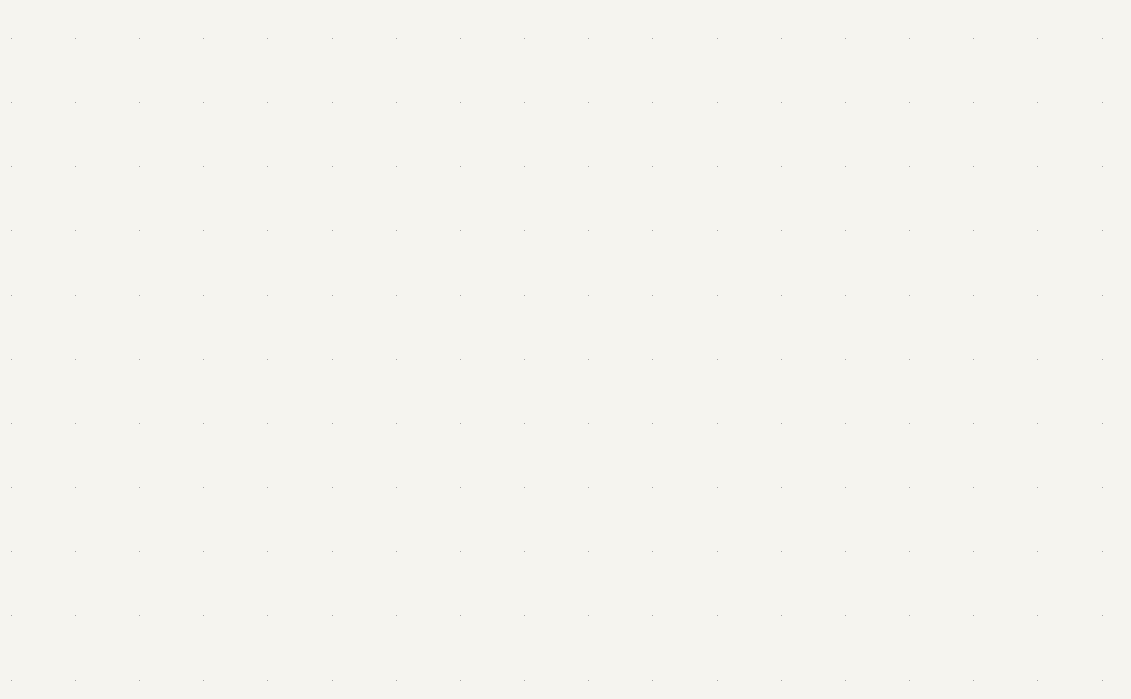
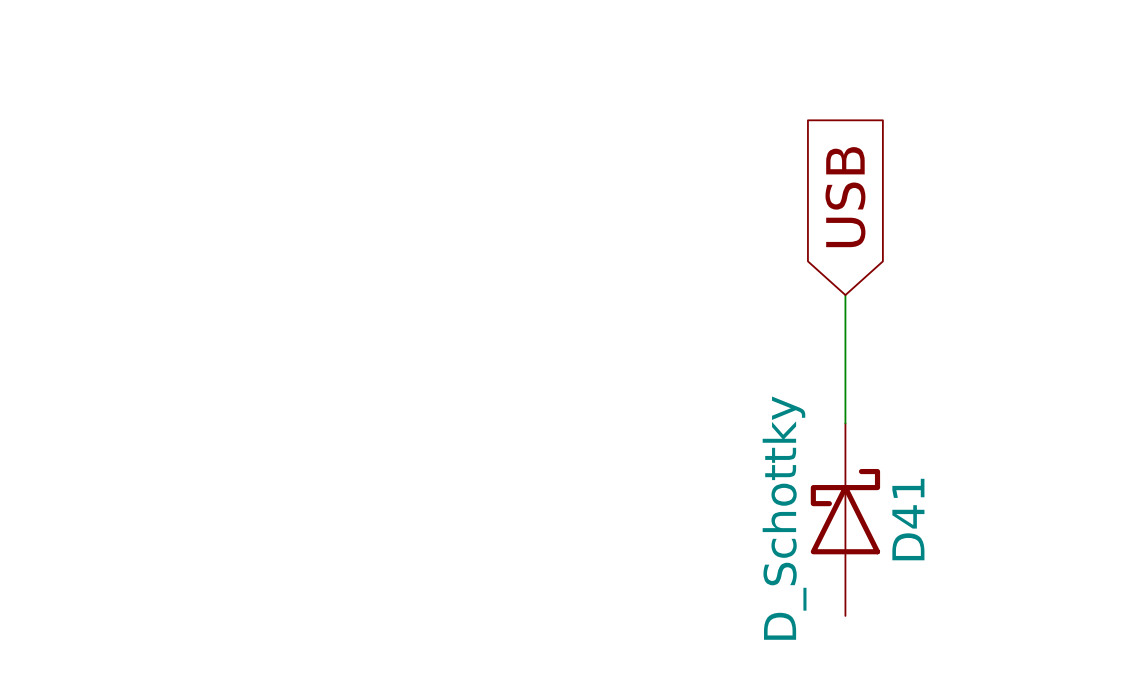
global label: none -> USB (845, 197)
wire: none -> (845, 295) (845, 423)
D41: none -> D_Schottky (845, 519)

